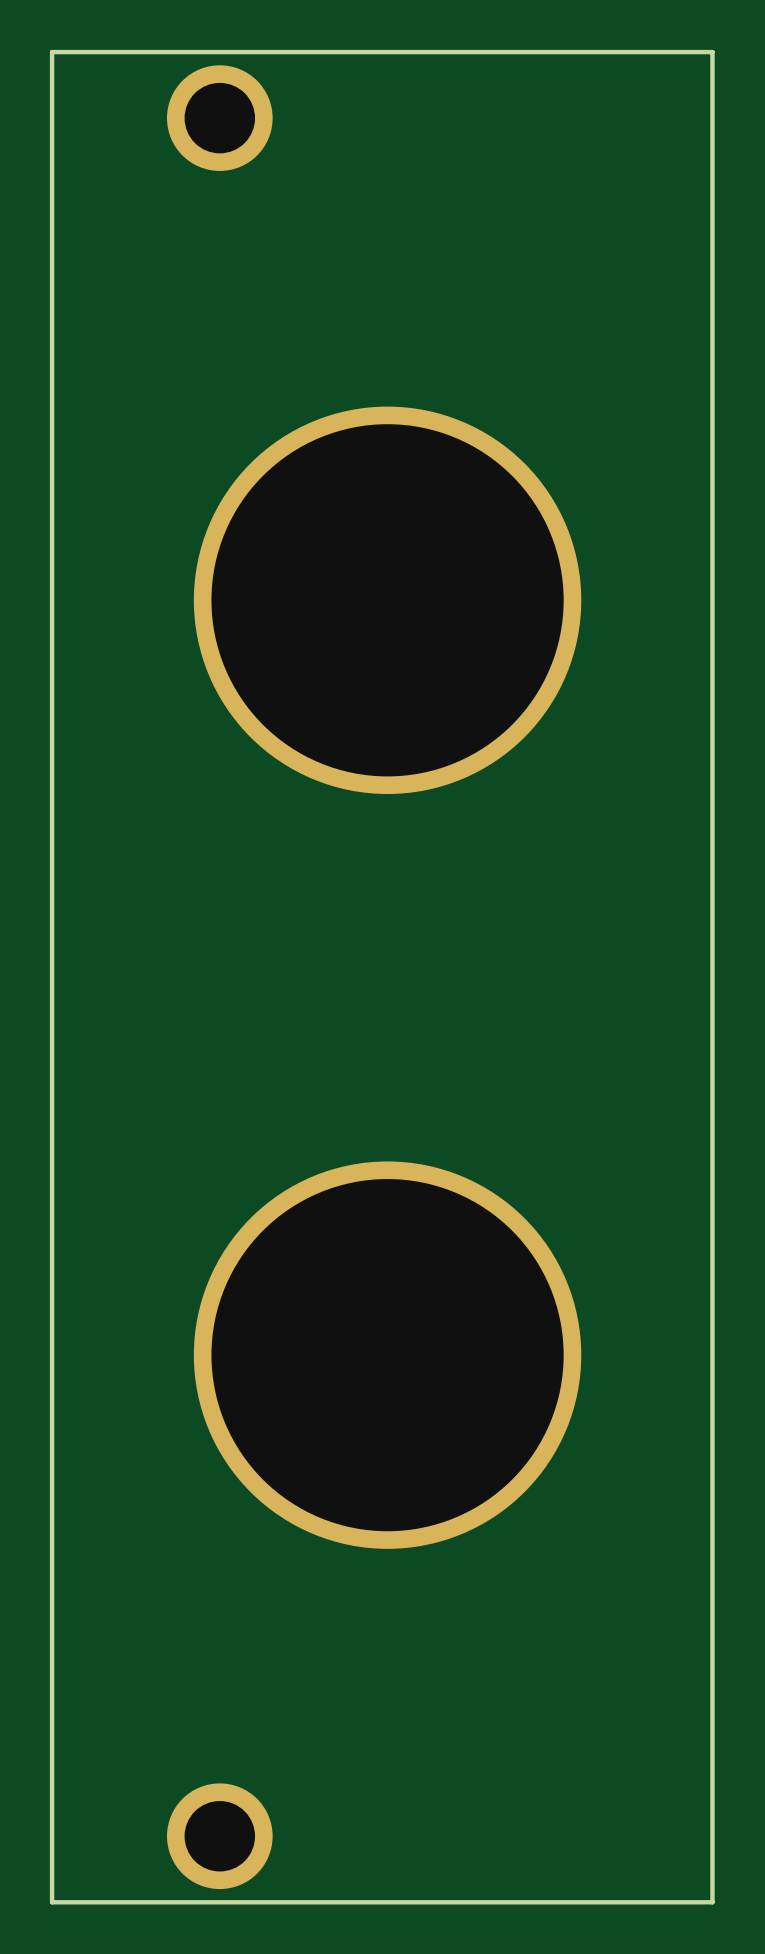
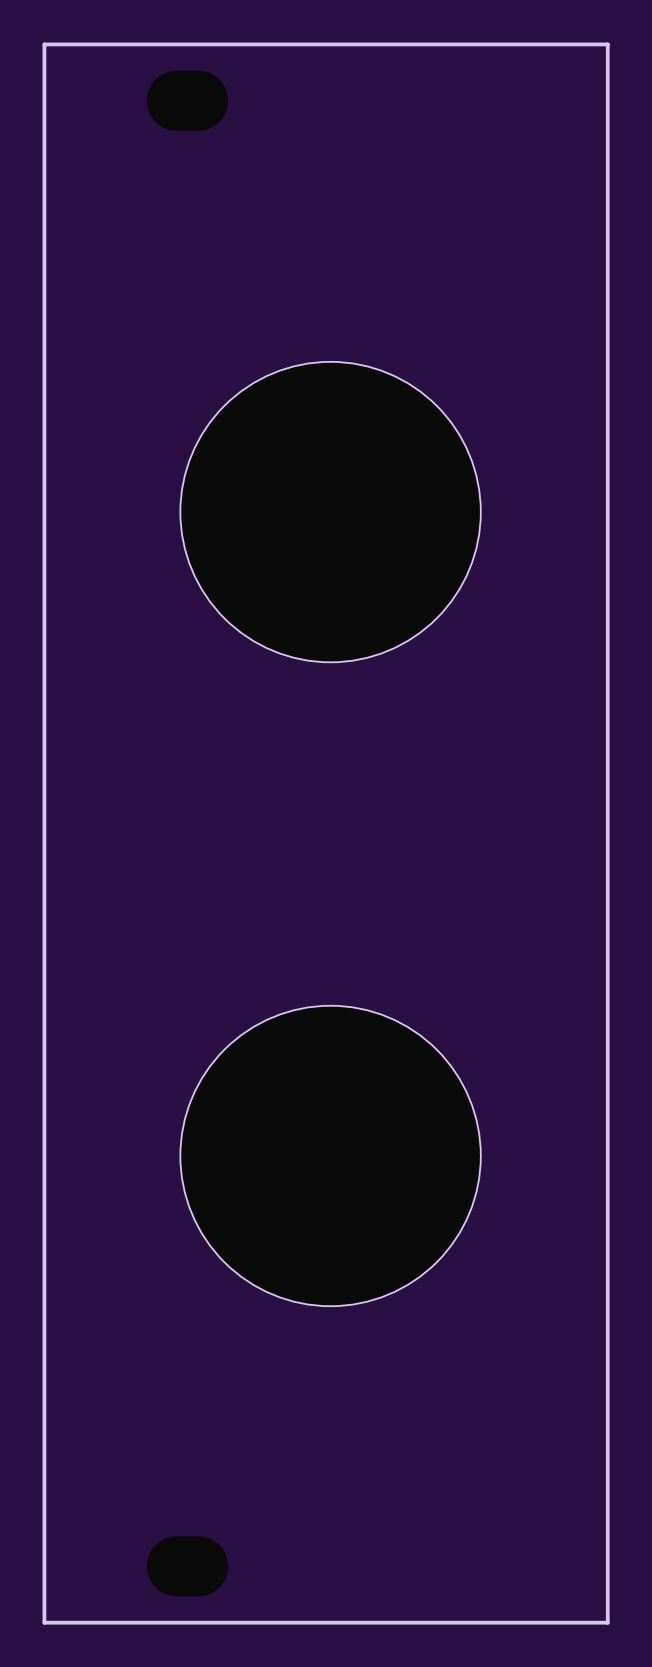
part footprint: [166, 65, 273, 171] -> [146, 70, 229, 131]
part footprint: [193, 406, 582, 795] -> [180, 361, 481, 663]
part footprint: [193, 1161, 582, 1549] -> [180, 1005, 481, 1307]
part footprint: [166, 1783, 273, 1890] -> [146, 1536, 229, 1597]

